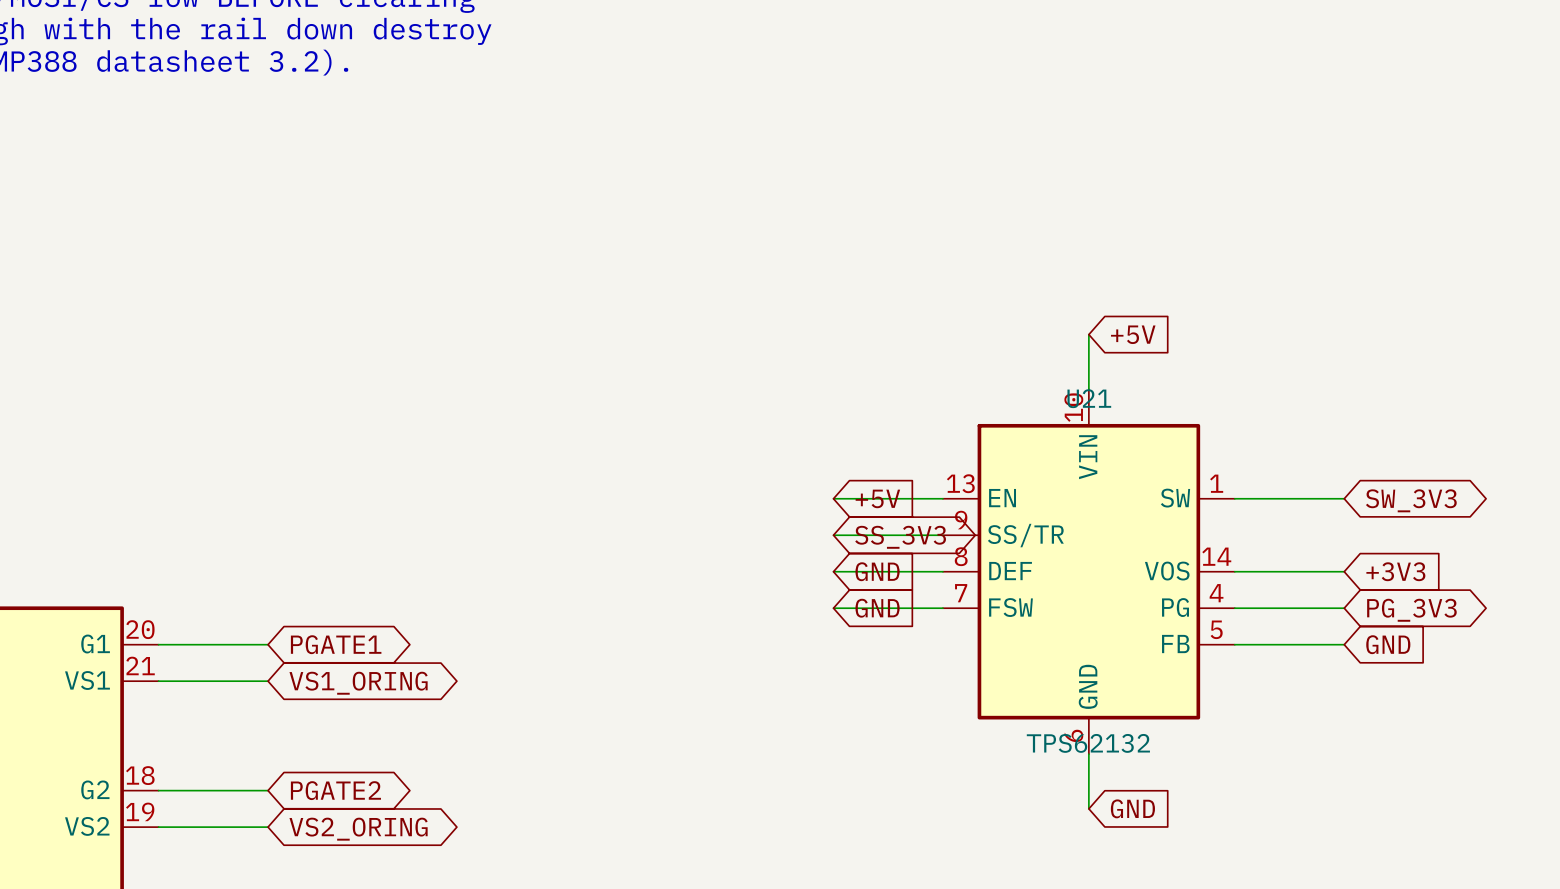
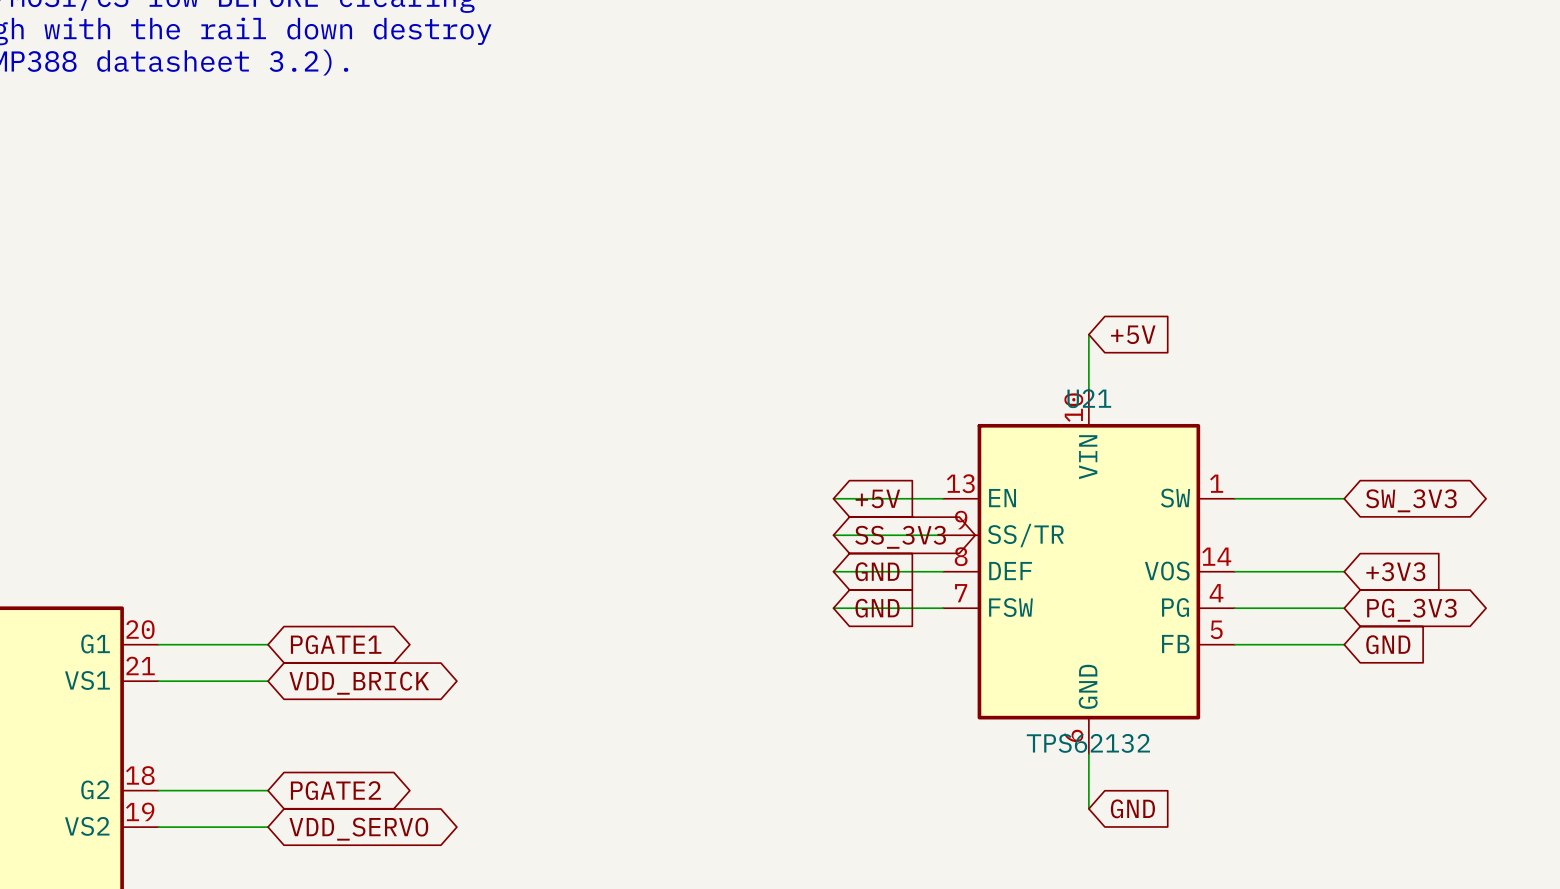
global label: VS1_ORING (358, 683) -> VDD_BRICK (359, 683)
global label: VS2_ORING (358, 829) -> VDD_SERVO (358, 829)

